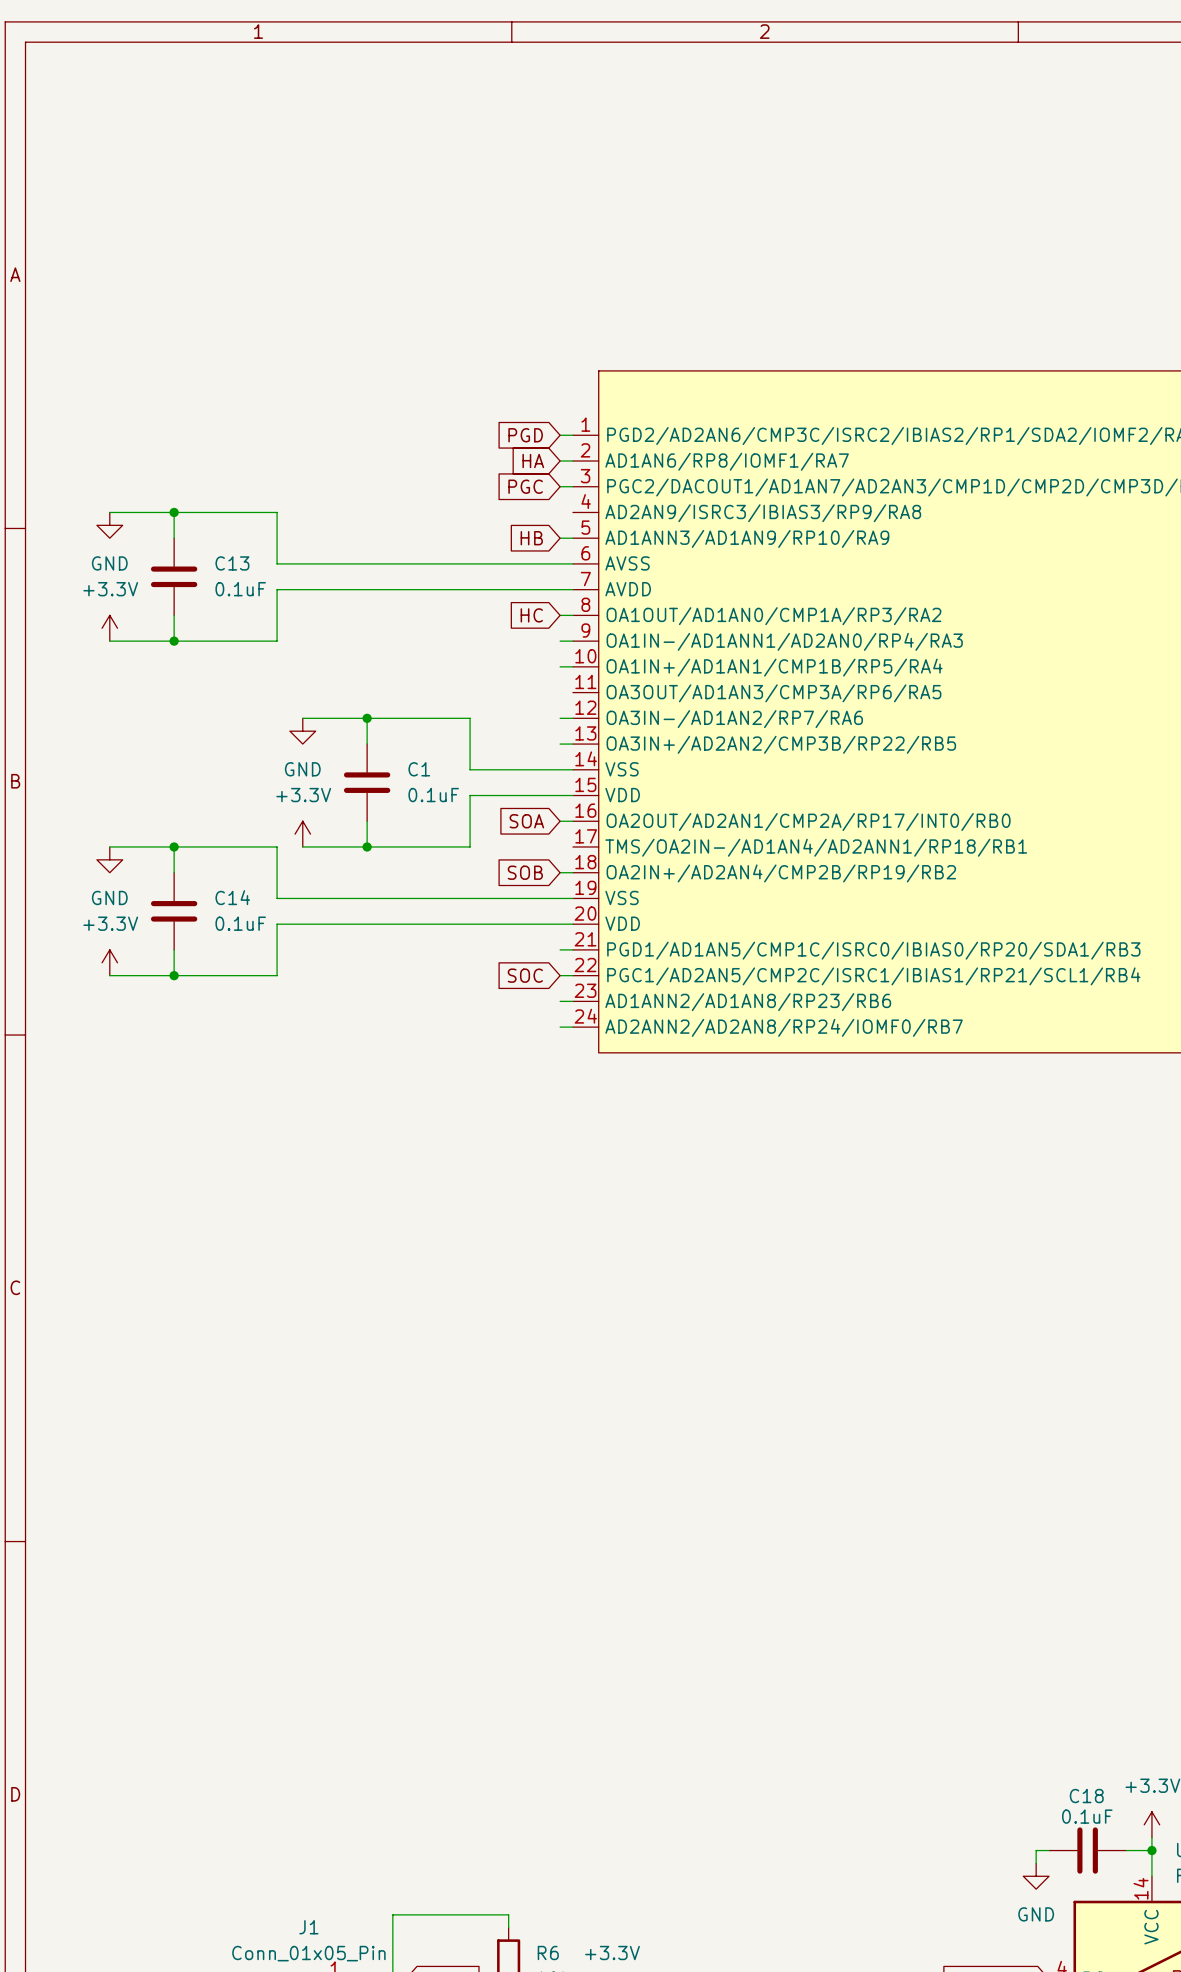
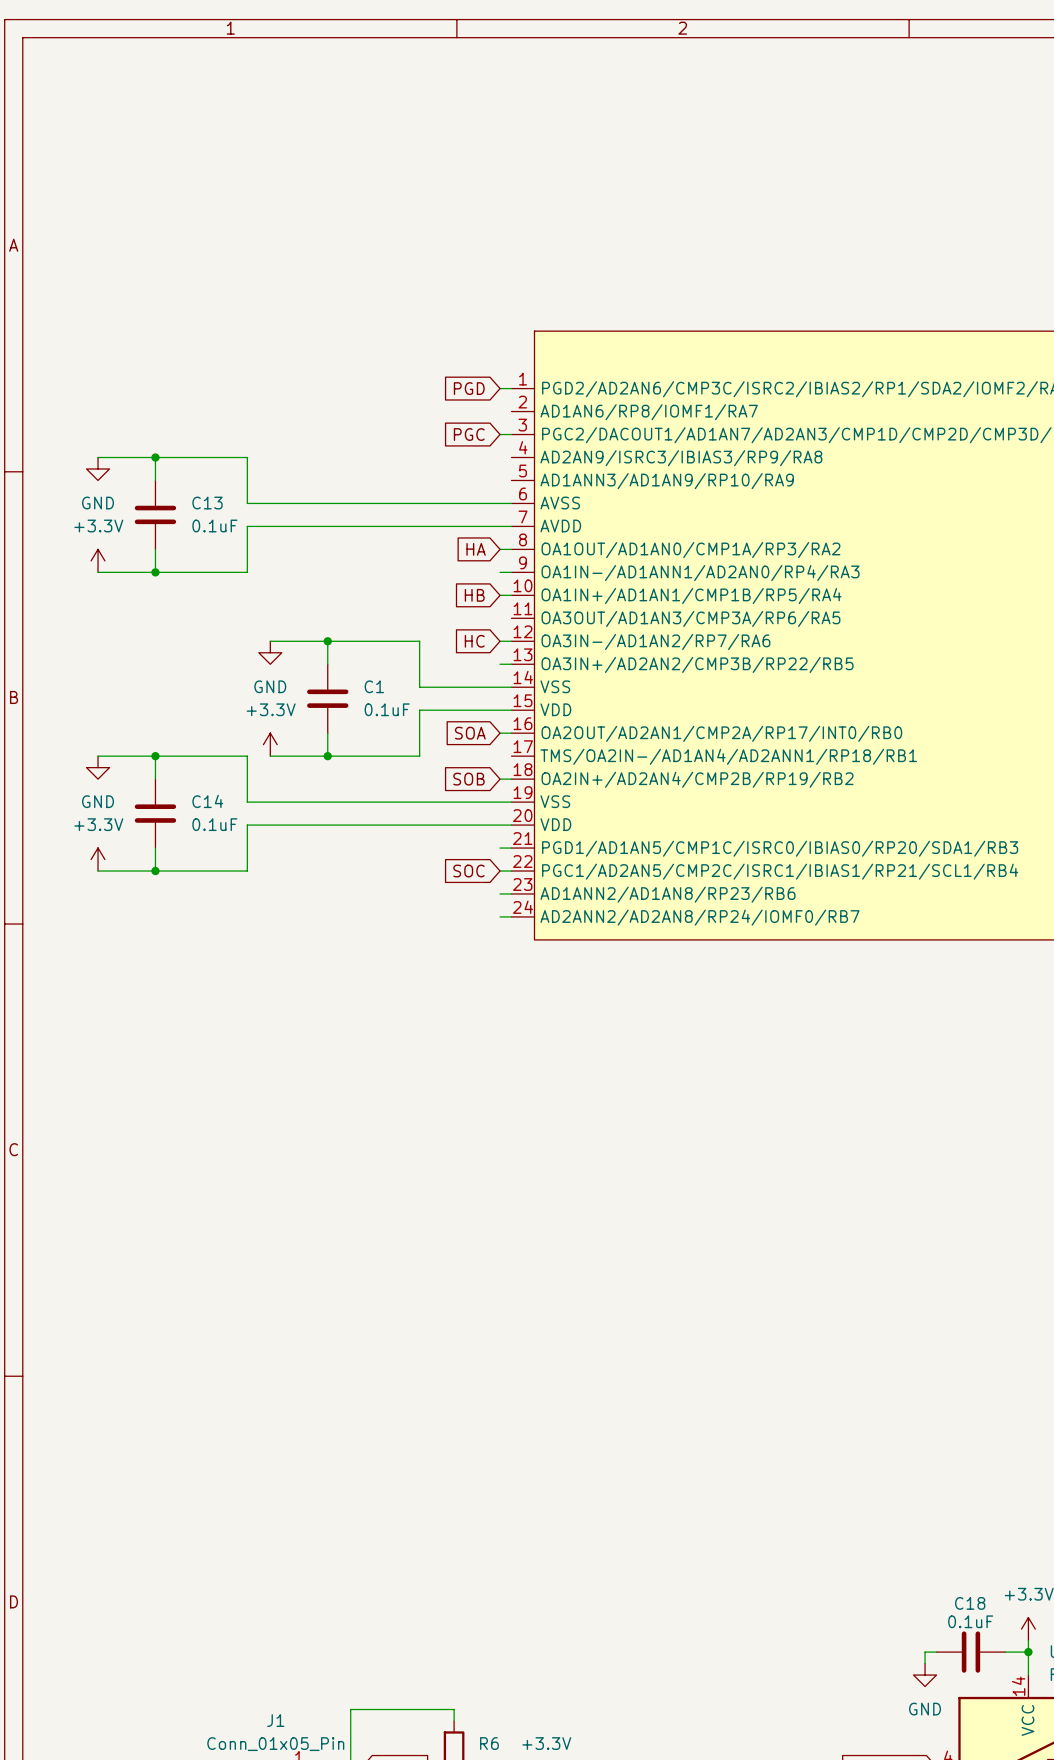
global label: HA (533, 461) -> none
wire: (560, 461) (572, 461) -> none
global label position: HB (531, 538) -> HB (474, 595)
wire: (560, 538) (572, 538) -> none
global label: HC (531, 615) -> HA (476, 549)
global label: none -> HC (474, 641)

